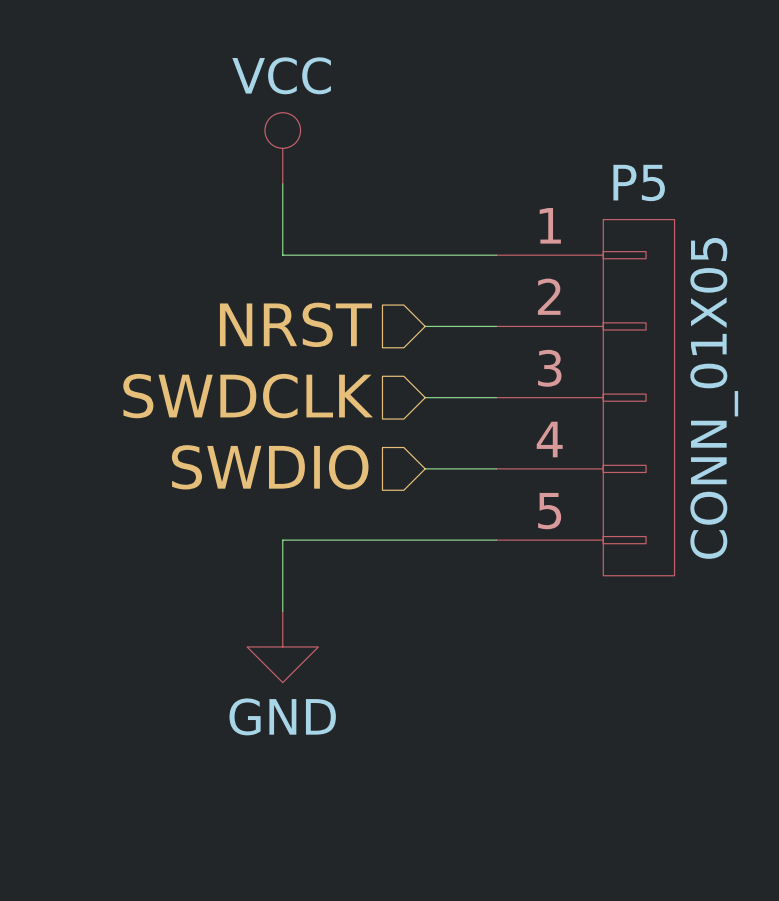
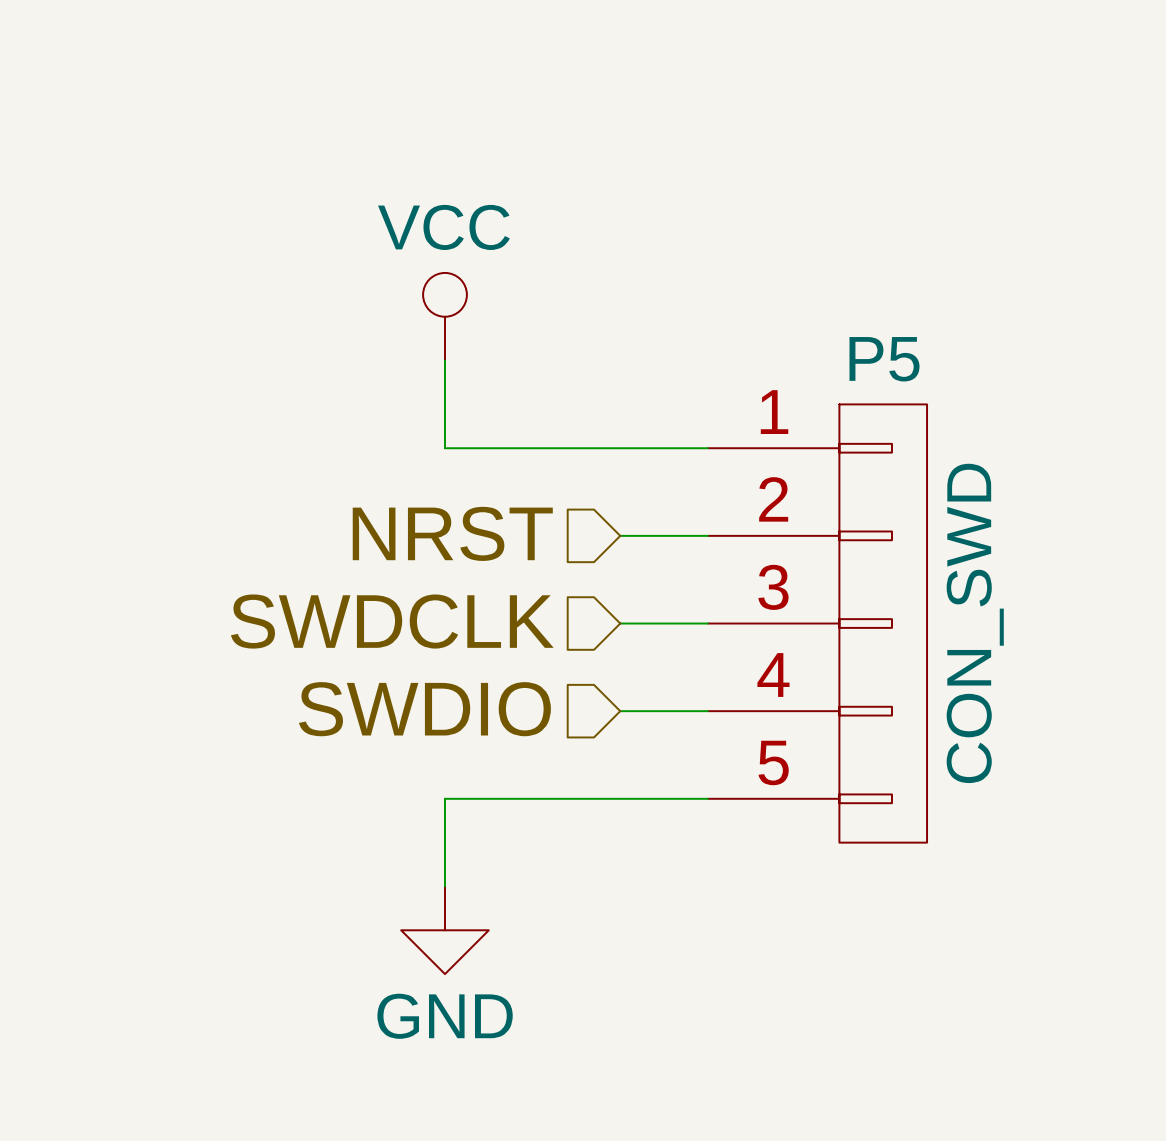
P5 value: CONN_01X05 (714, 398) -> CON_SWD (975, 623)

